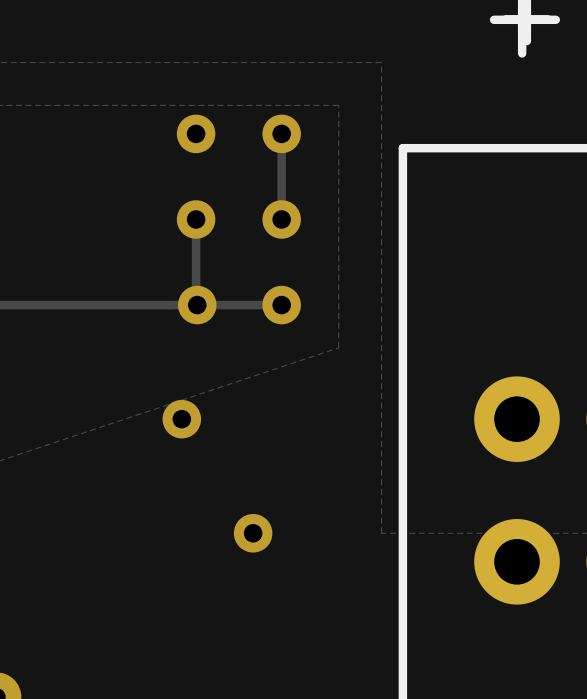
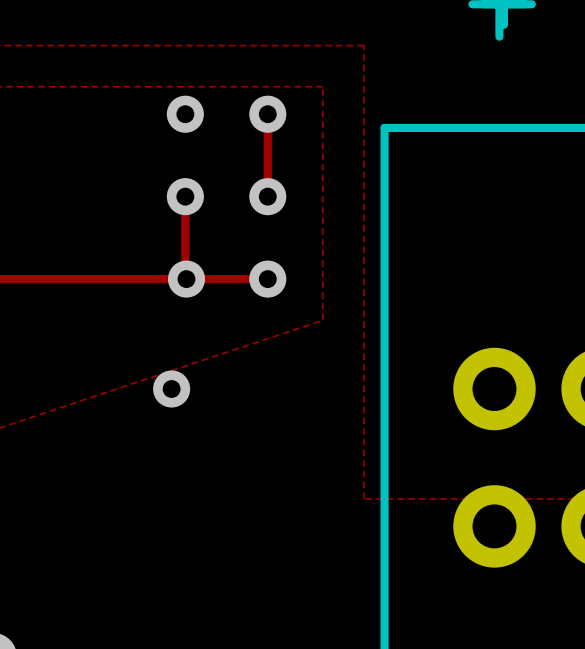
via: (253, 533) -> none

